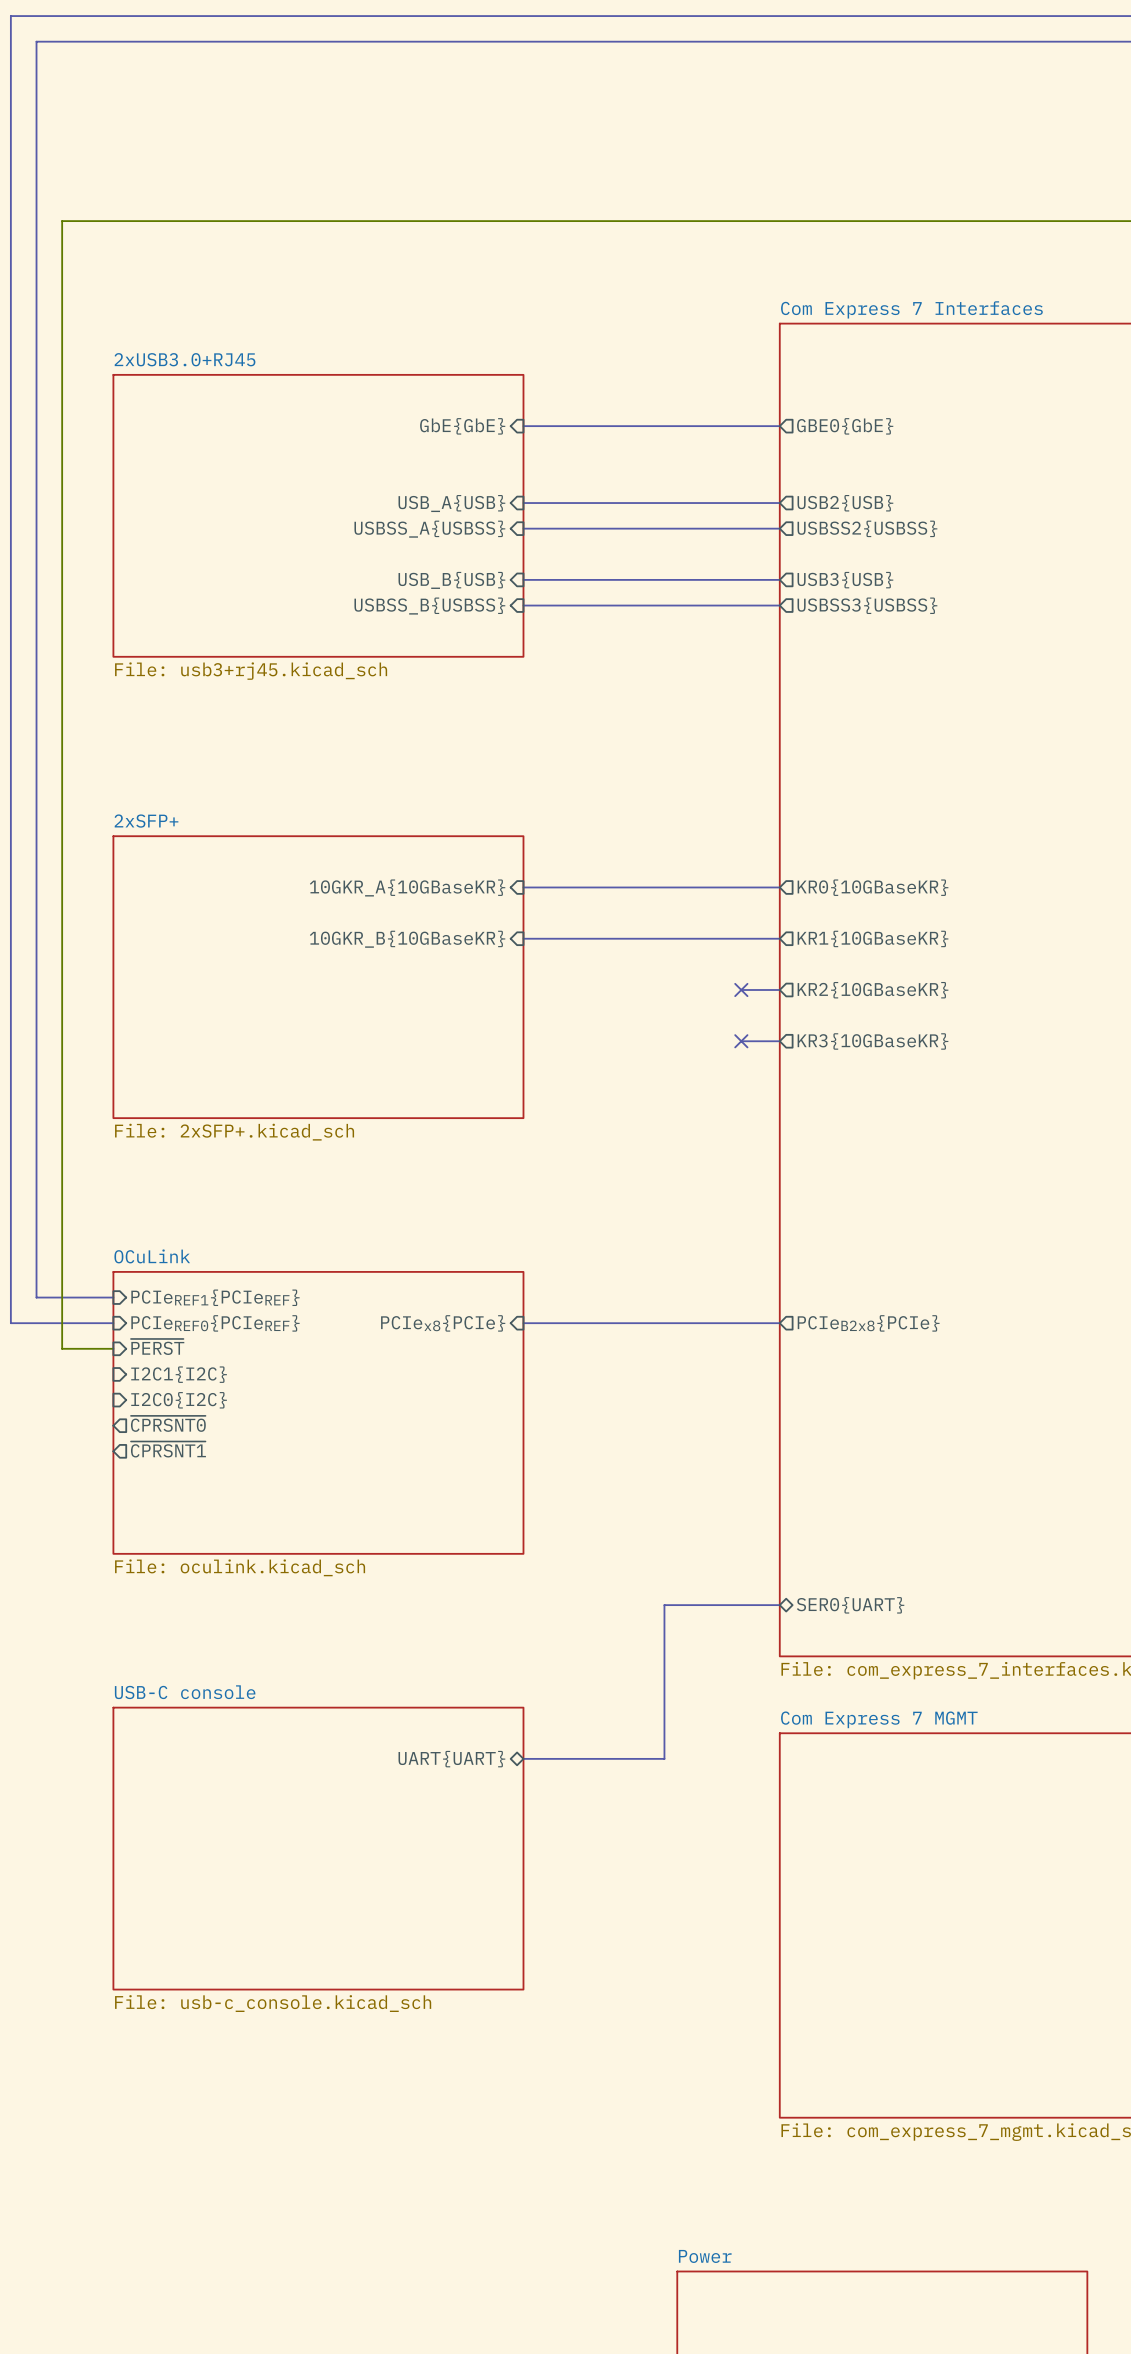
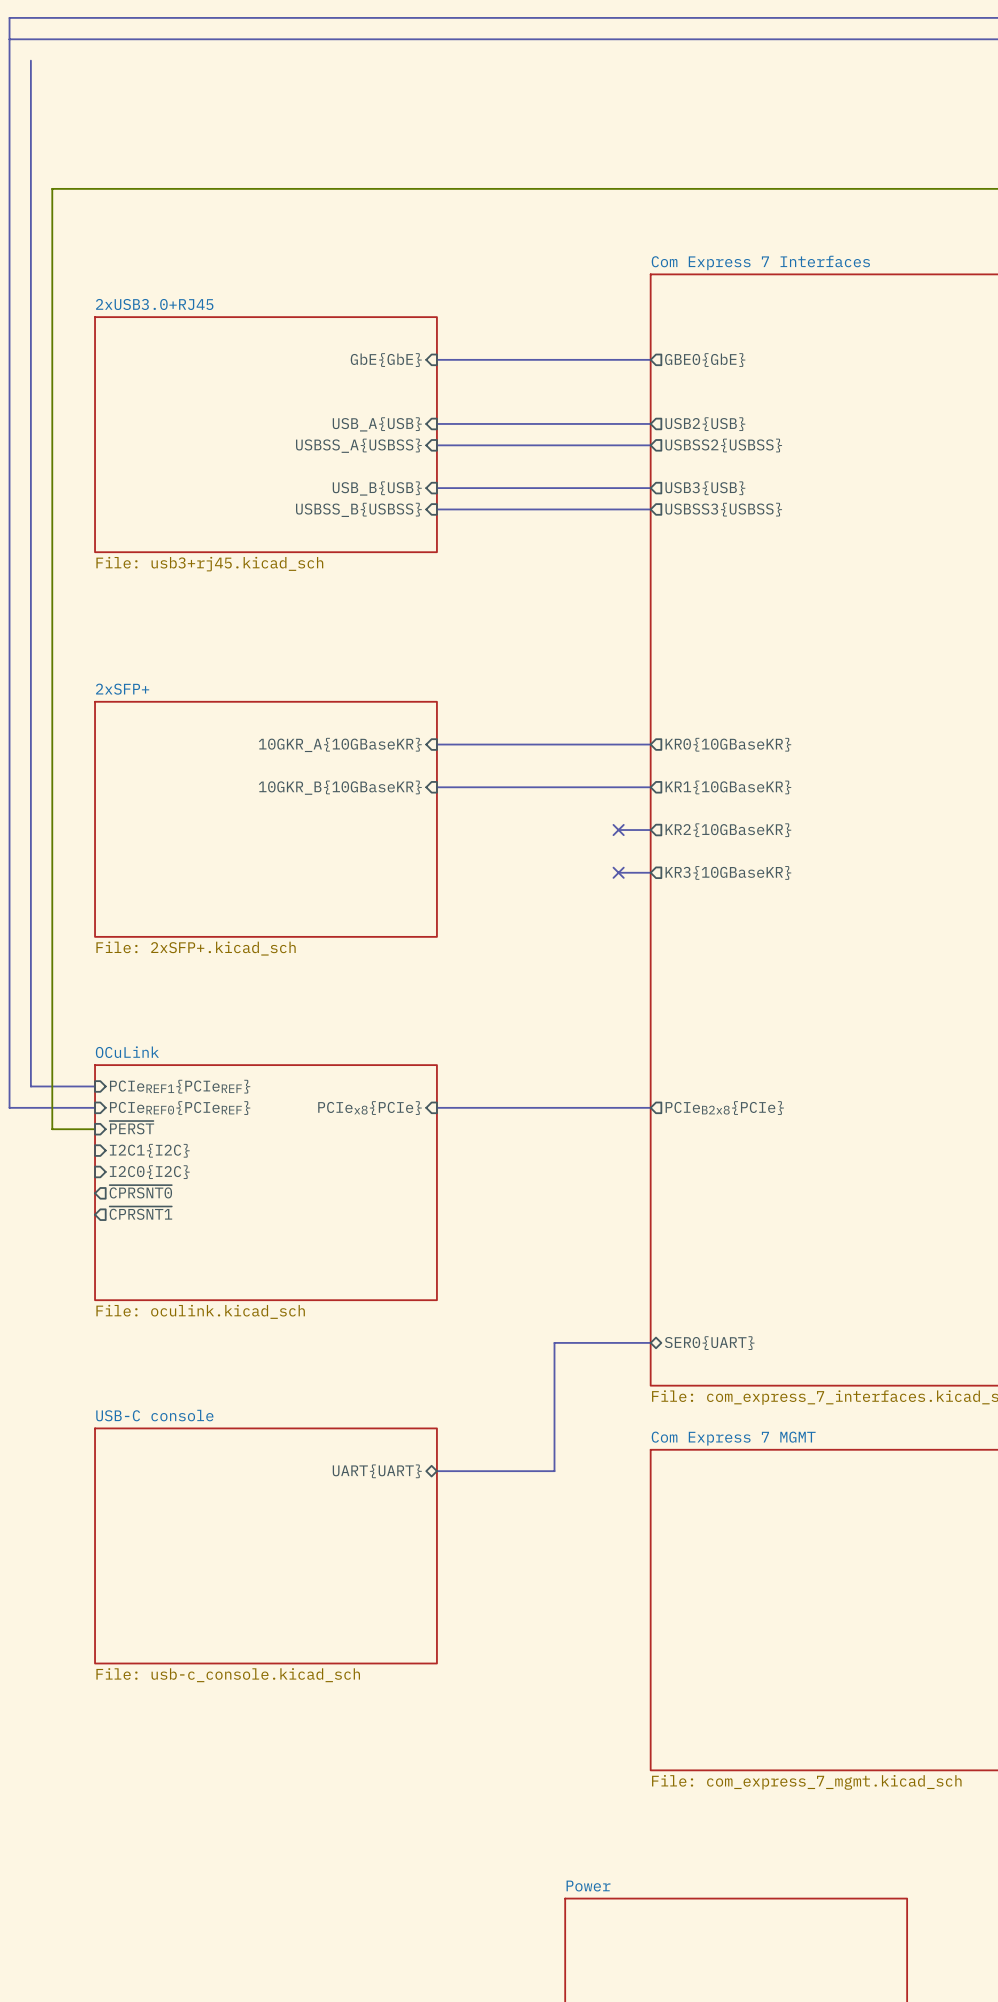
bus: (36, 41) (36, 67) -> (30, 39) (9, 39)

